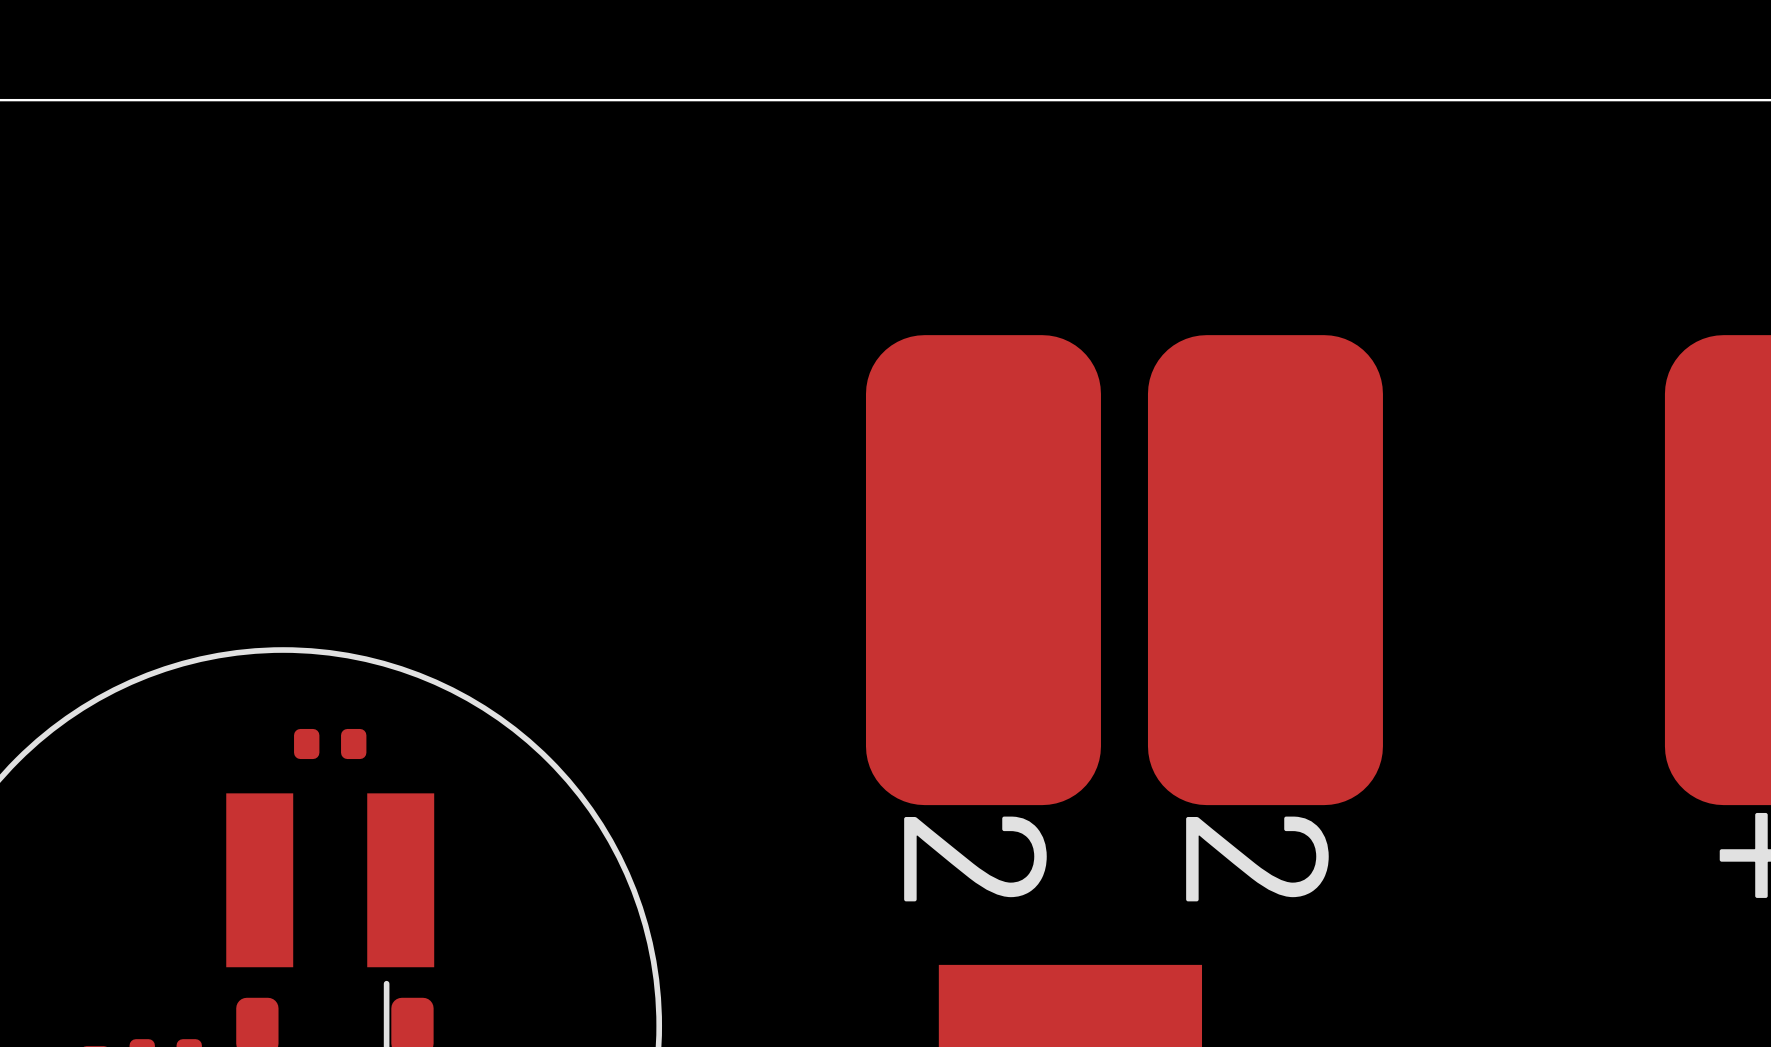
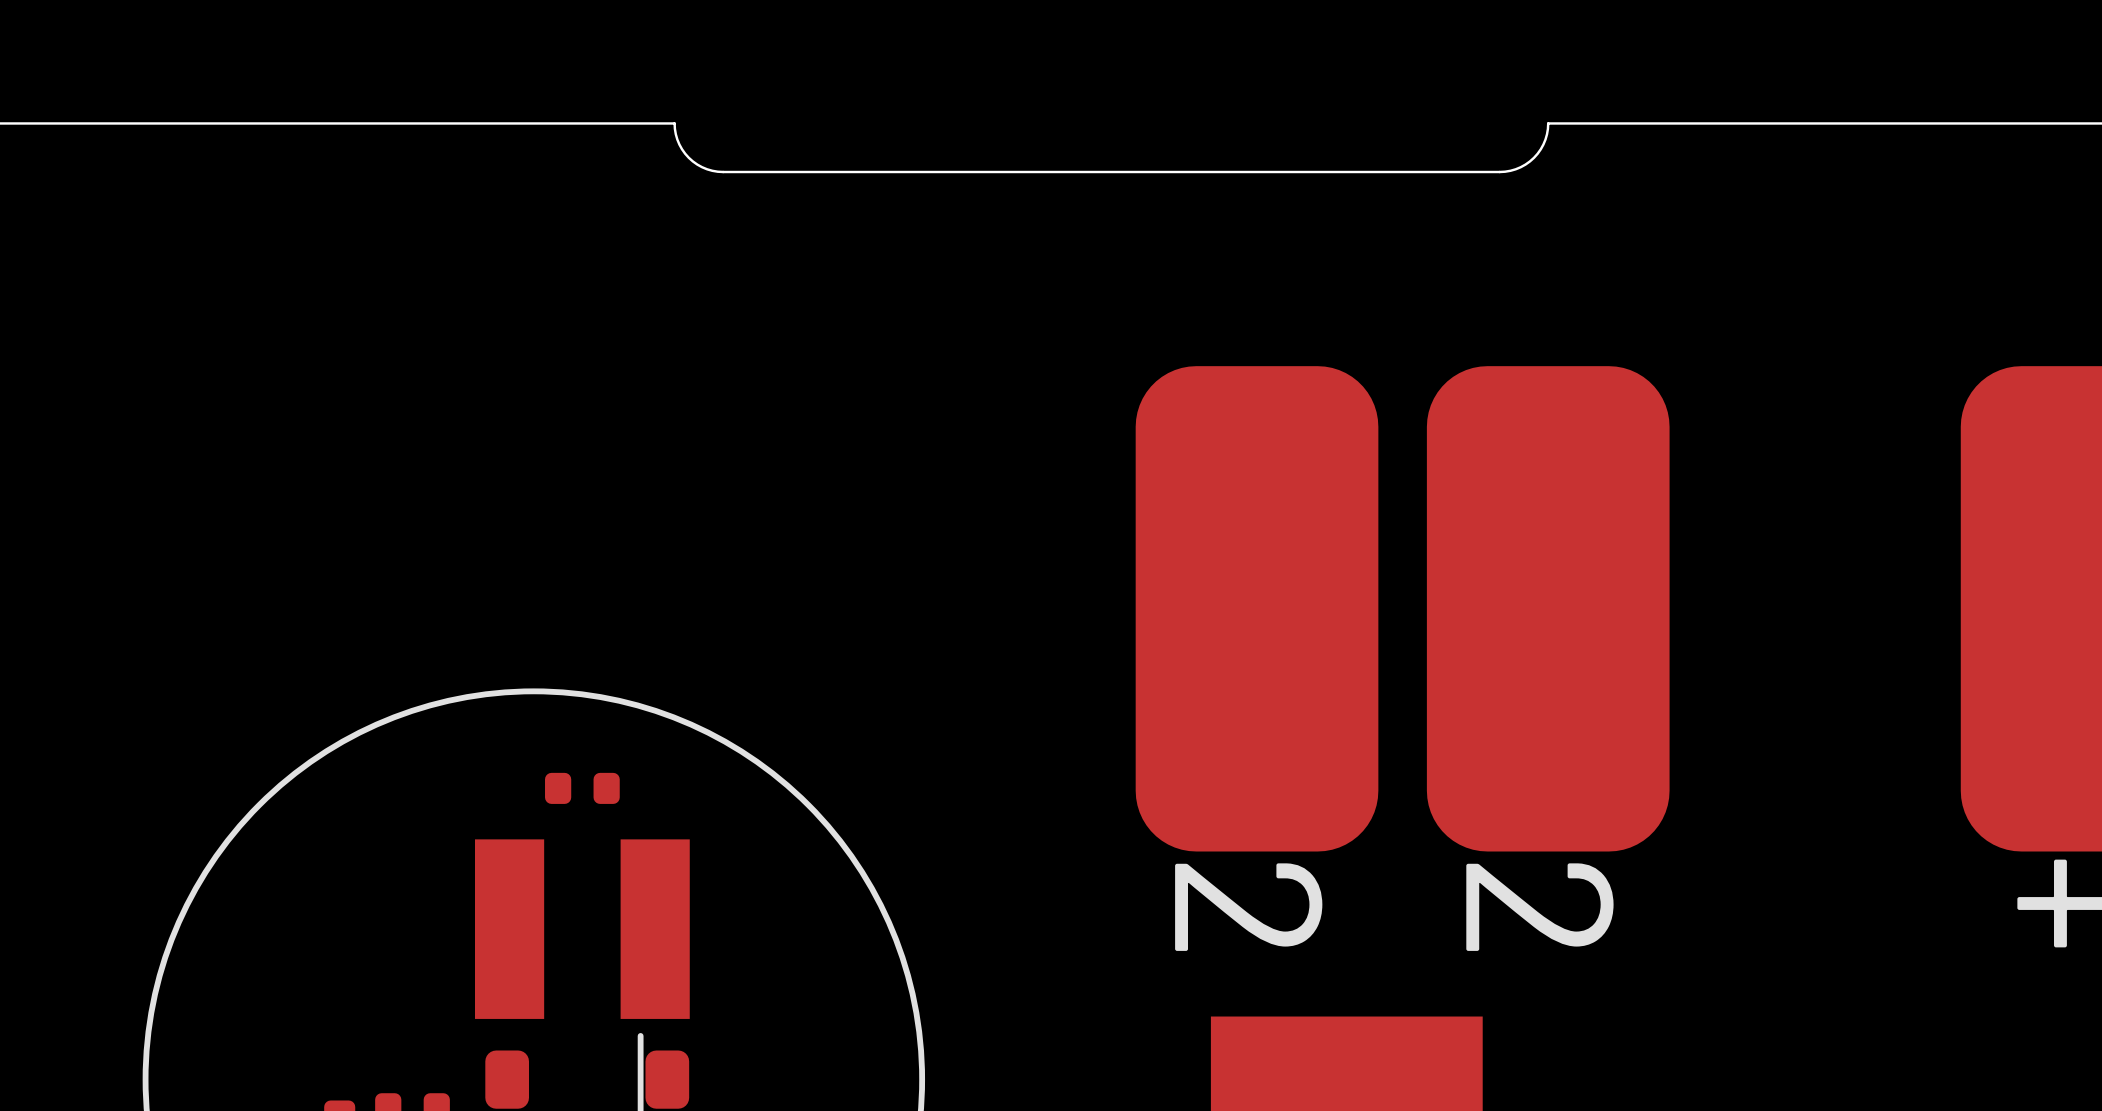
board edge: (419, 100) (1265, 100) -> (674, 123) (677, 139) (688, 157) (707, 169) (723, 172) (1505, 171) (1520, 167) (1534, 157) (1545, 139) (1548, 123)

